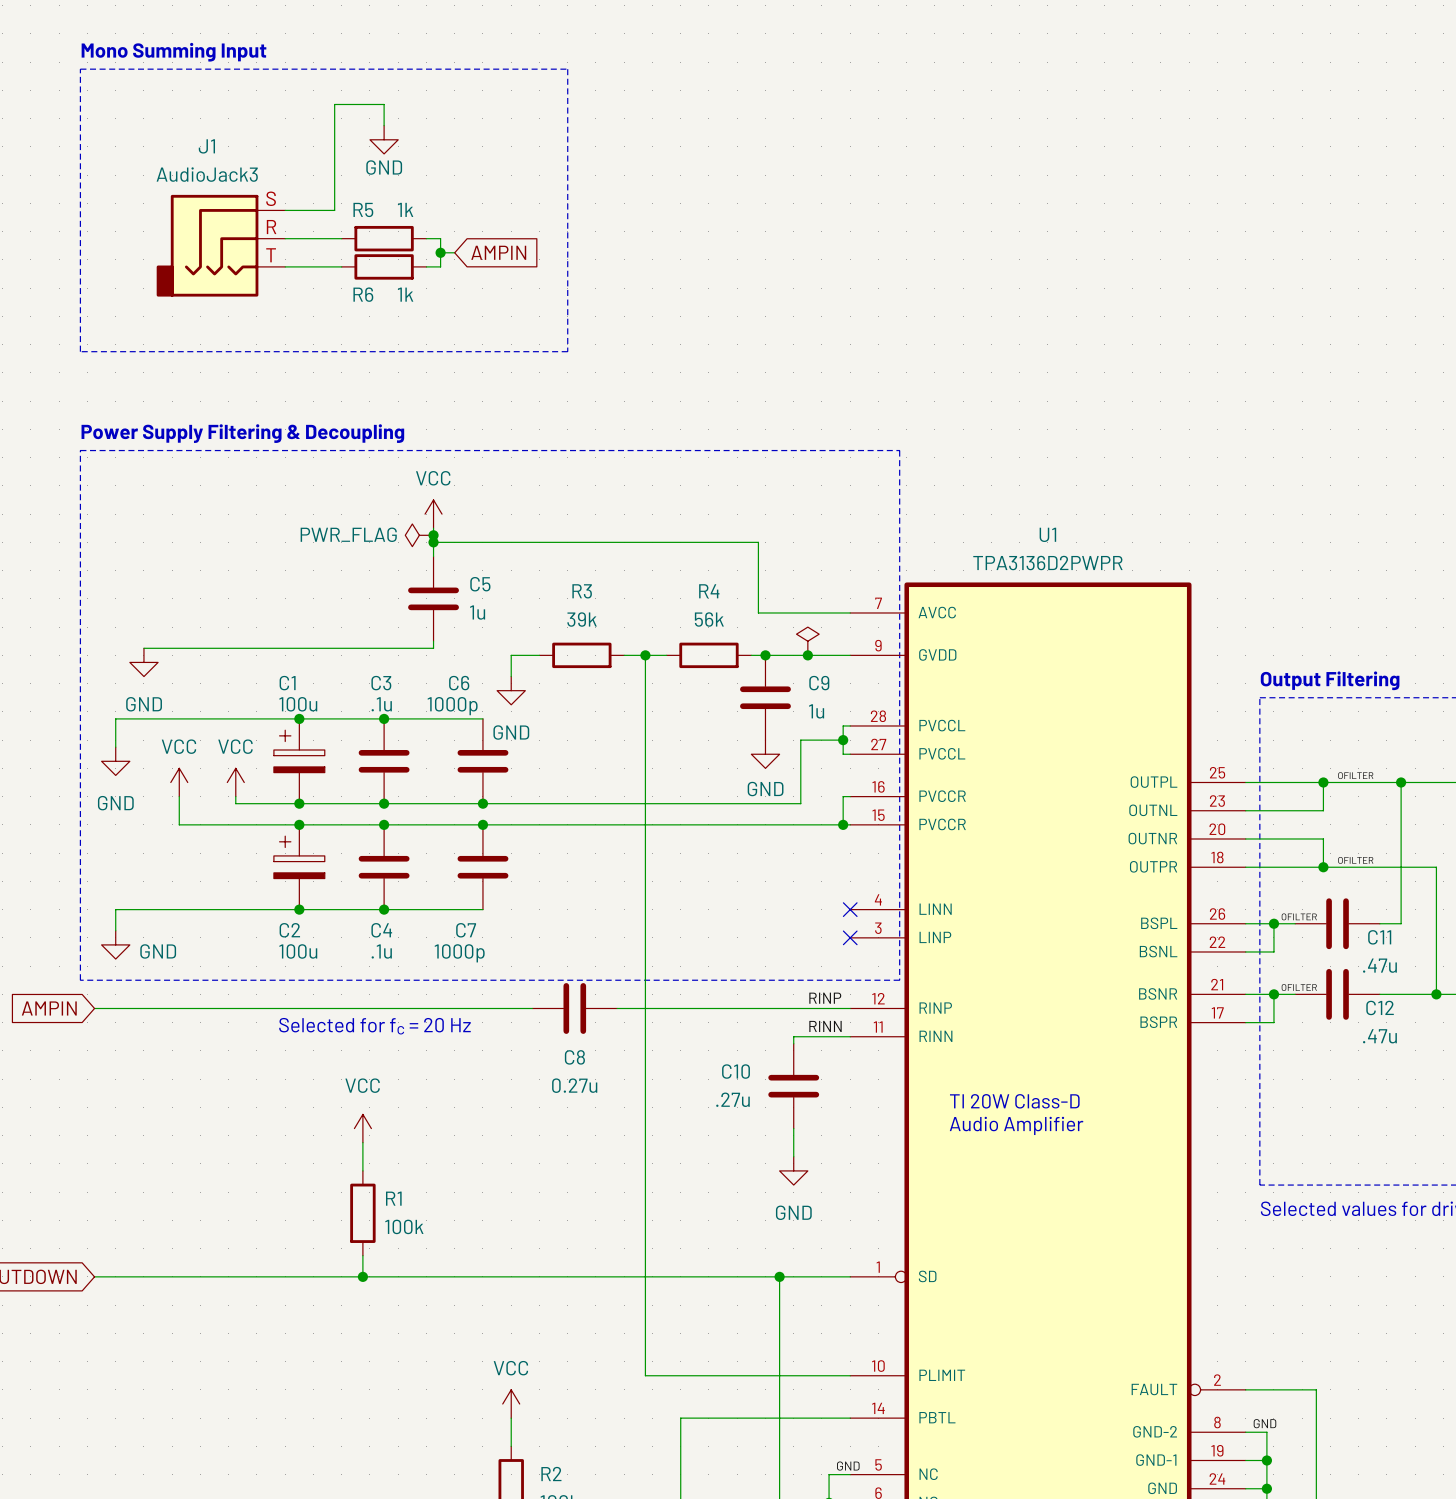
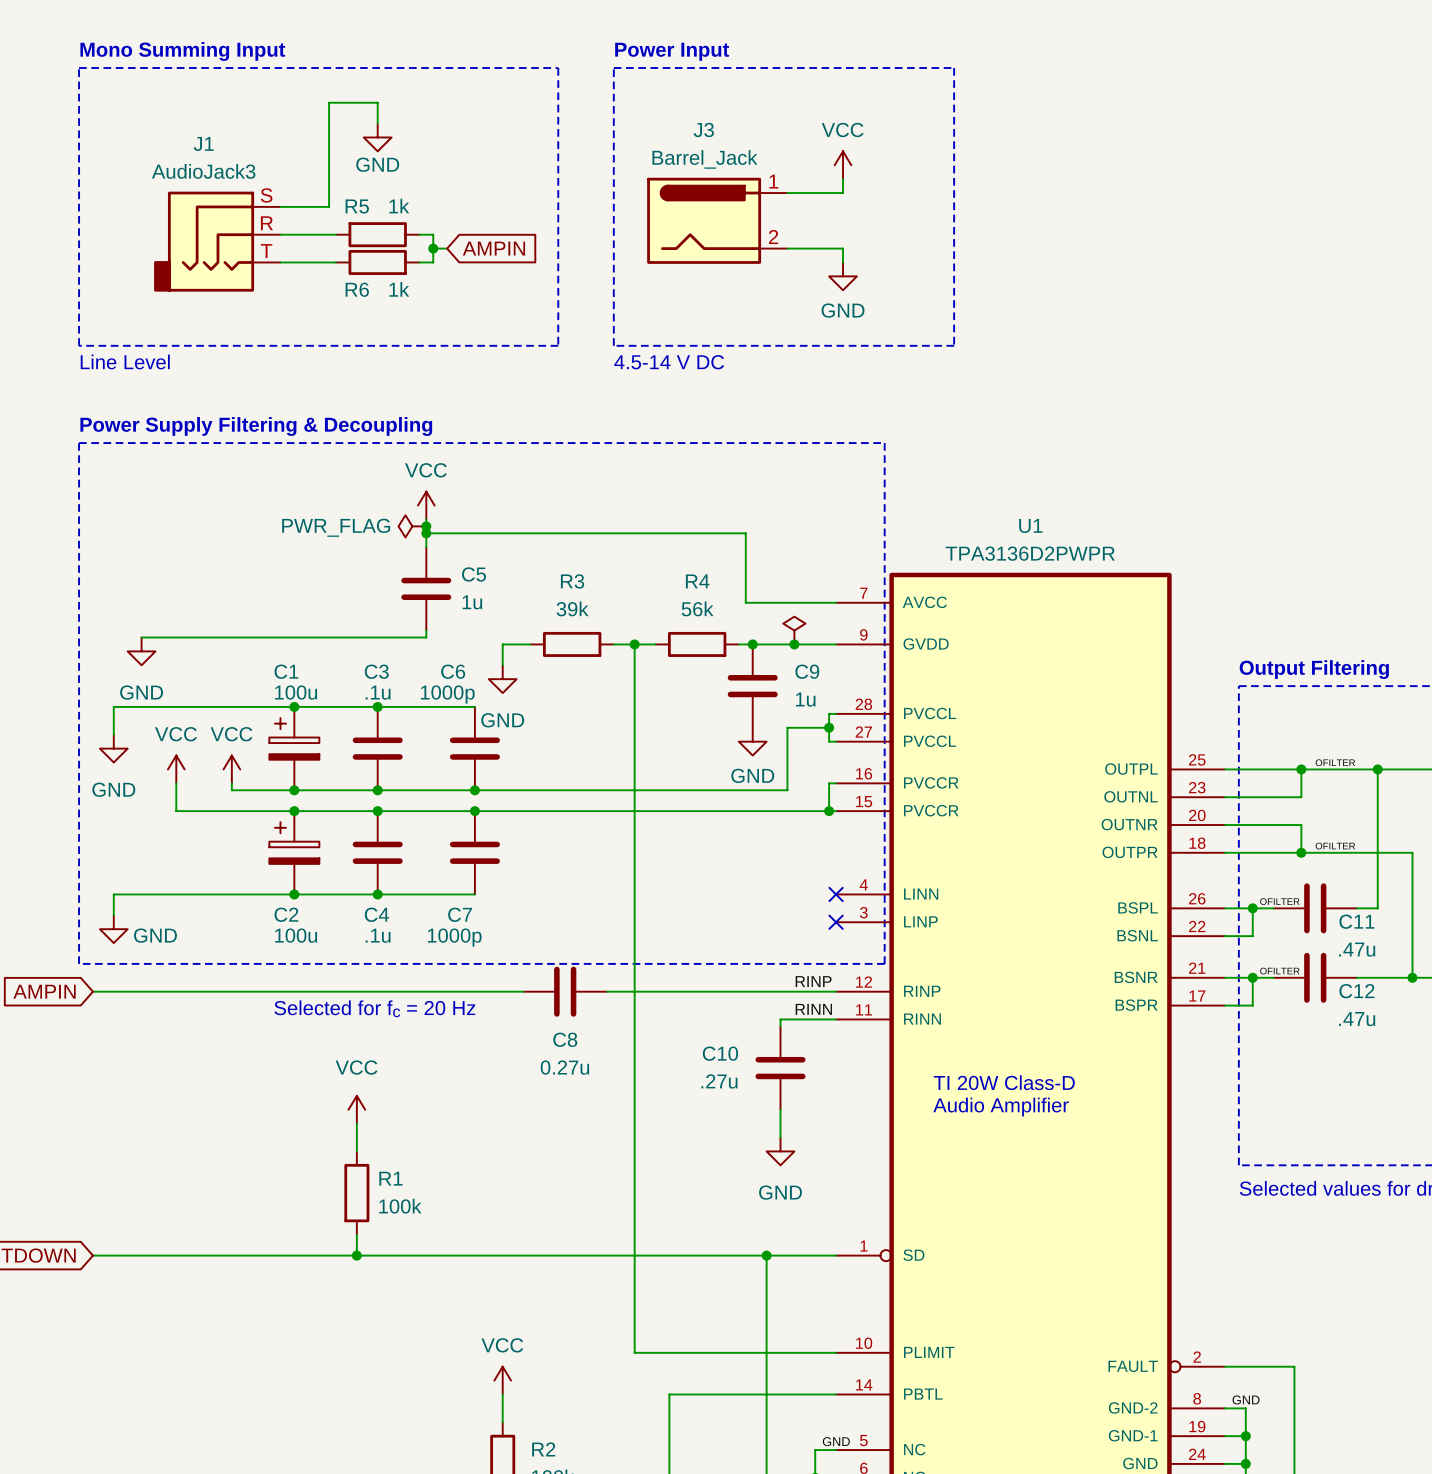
text: none -> Power Input (672, 51)
line: none -> (613, 68) (954, 68) (954, 345) (613, 345) (613, 68)
power symbol: none -> VCC (843, 165)
wire: none -> (843, 179) (843, 193) (787, 193)
J3: none -> Barrel_Jack (717, 220)
wire: none -> (787, 248) (843, 248) (843, 262)
power symbol: none -> GND (843, 276)
text: none -> Line Level (125, 361)
text: none -> 4.5-14 V DC (669, 362)

